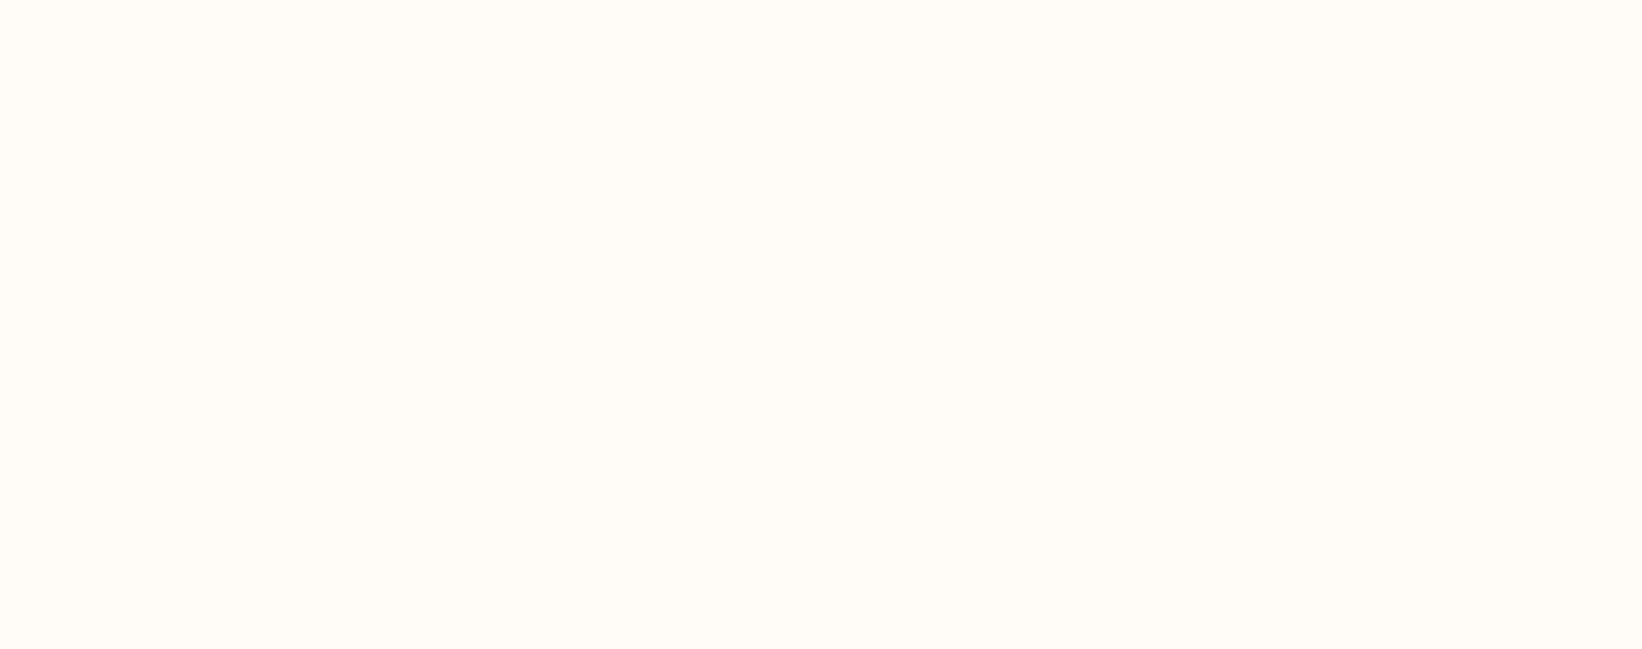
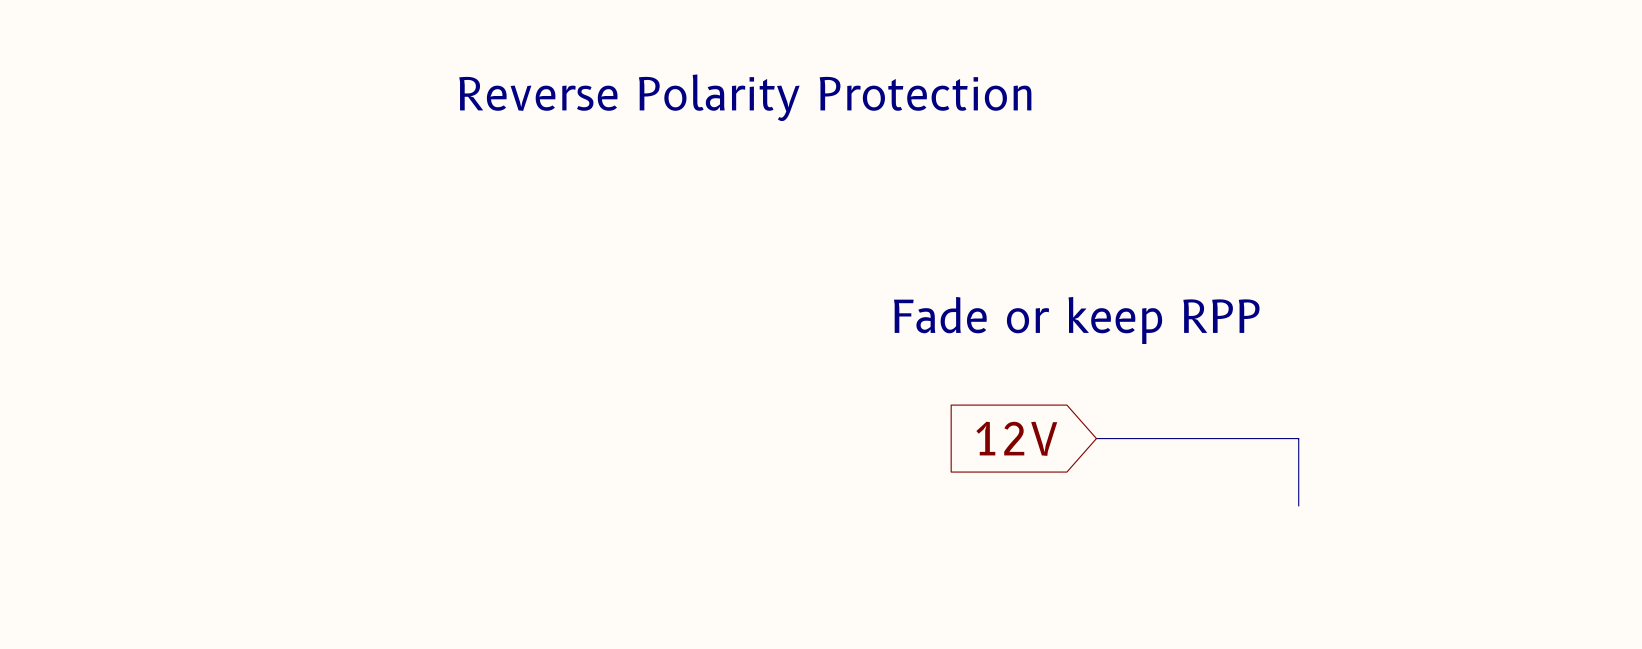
text: none -> Reverse Polarity Protection (745, 97)
text: none -> Fade or keep RPP (1076, 320)
global label: none -> 12V (1016, 438)
wire: none -> (1096, 438) (1298, 438) (1298, 506)

